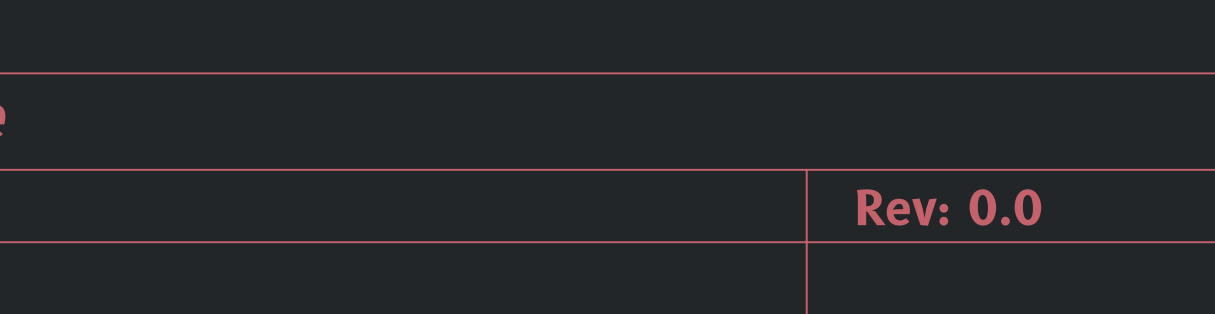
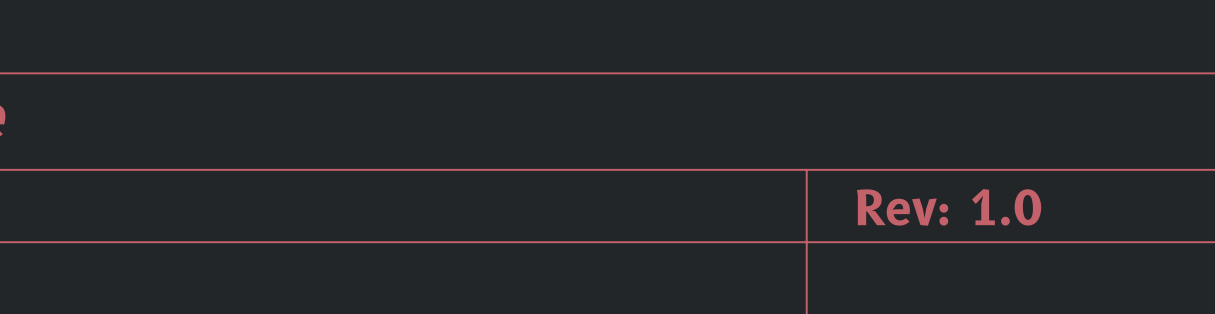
title block: Rev: 0.0 (949, 207) -> Rev: 1.0 (949, 207)

